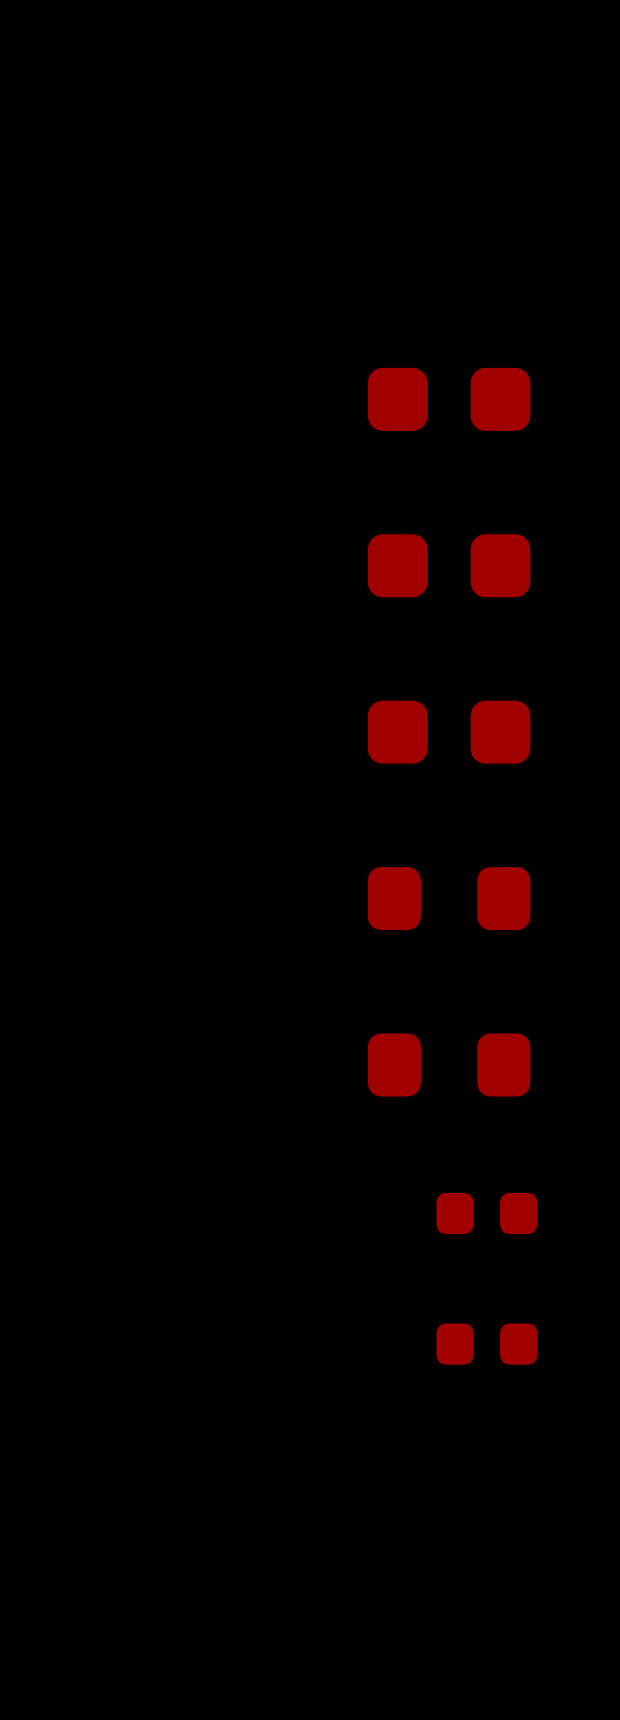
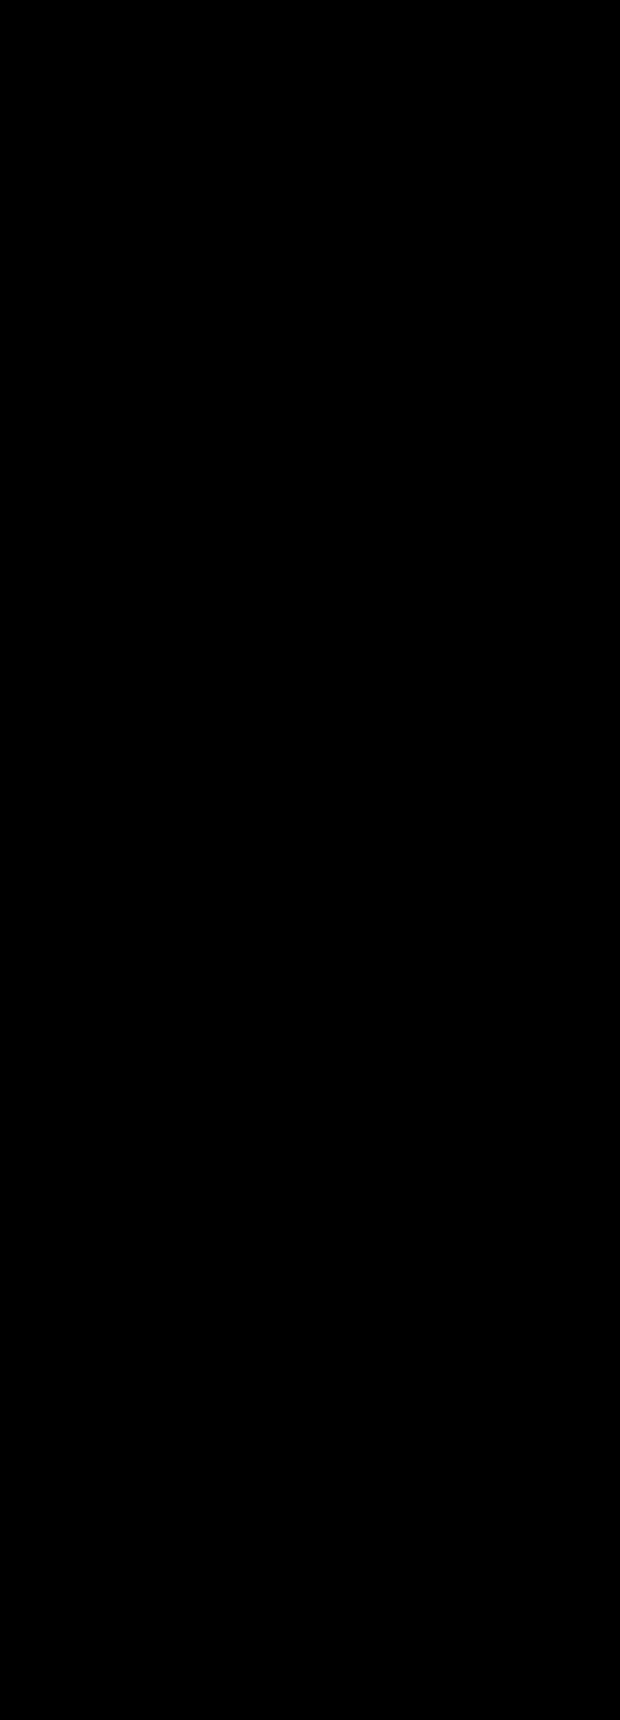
part: (449, 399) -> none
part: (449, 565) -> none
part: (449, 732) -> none
part: (449, 898) -> none
part: (449, 1064) -> none
part: (486, 1213) -> none
part: (486, 1344) -> none

